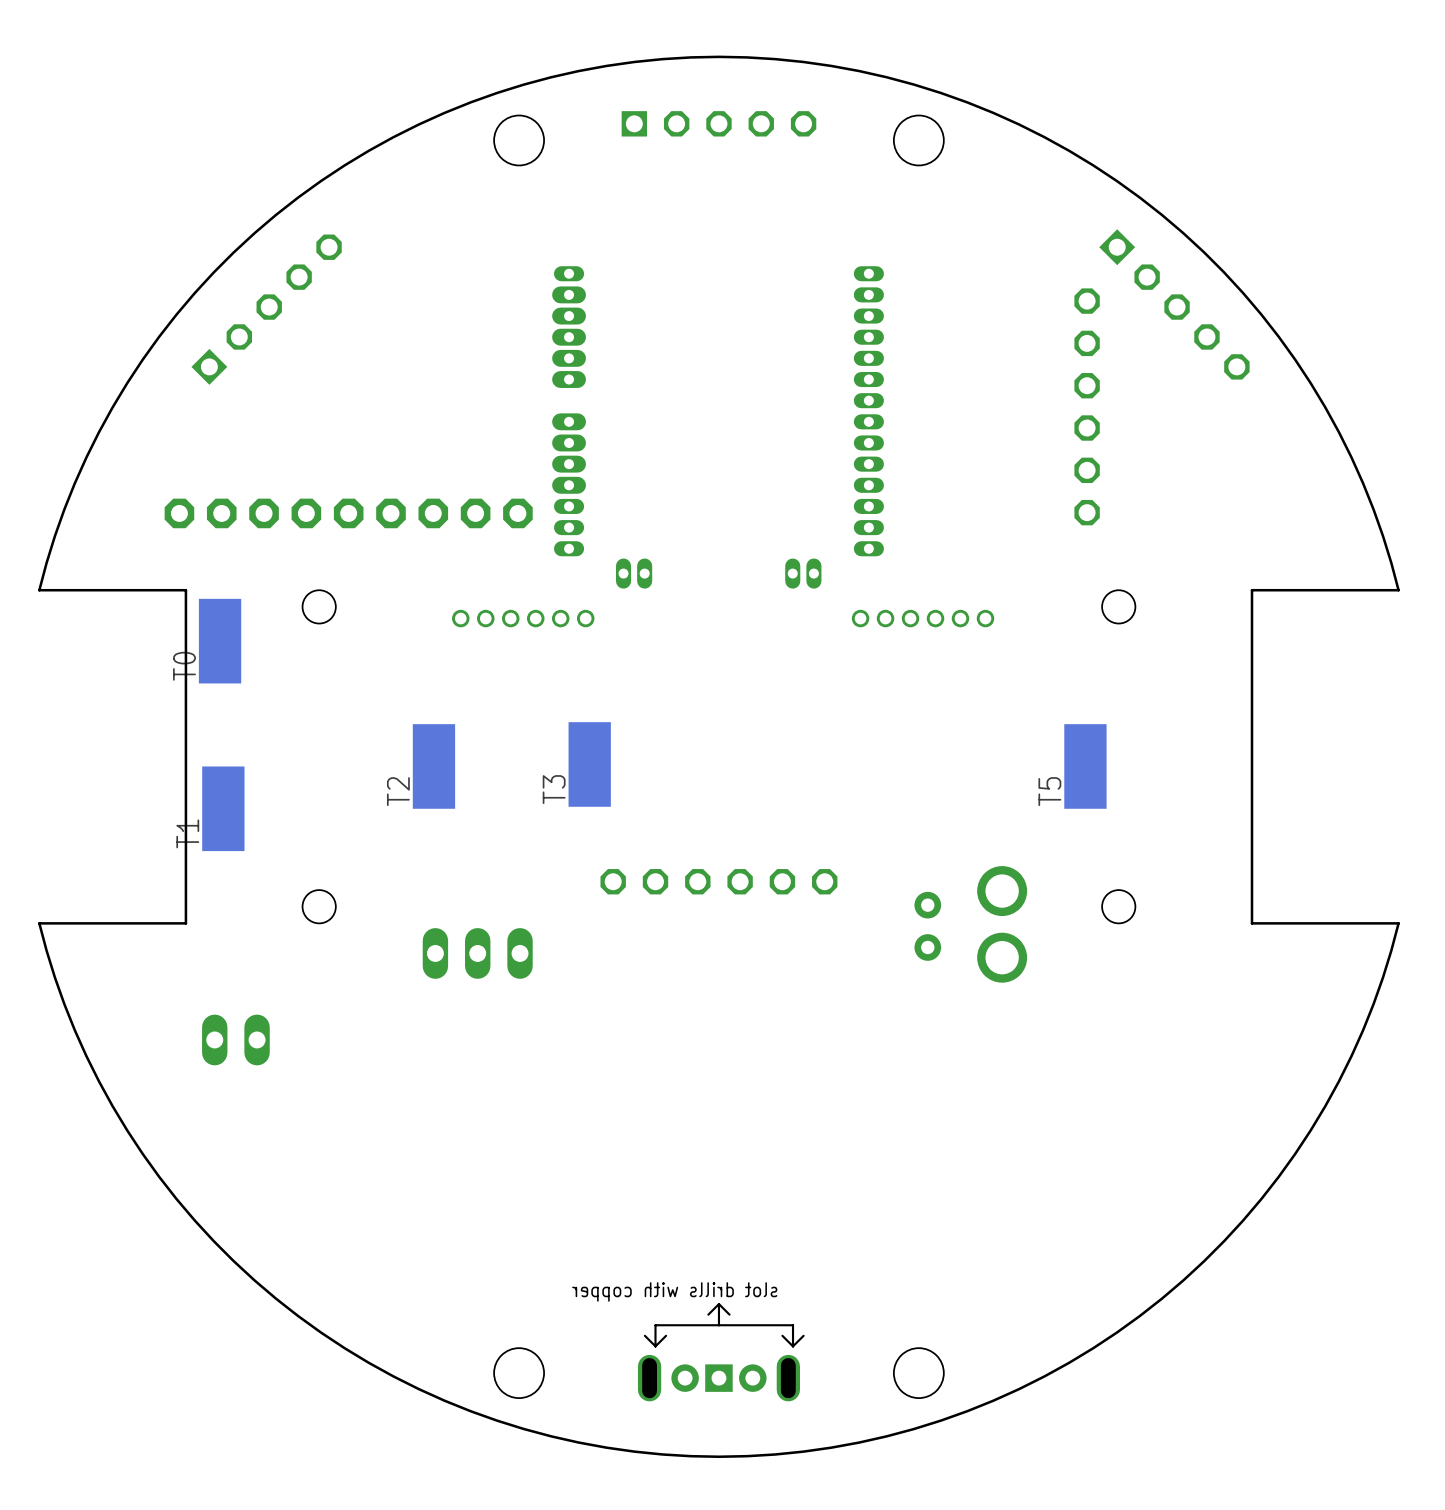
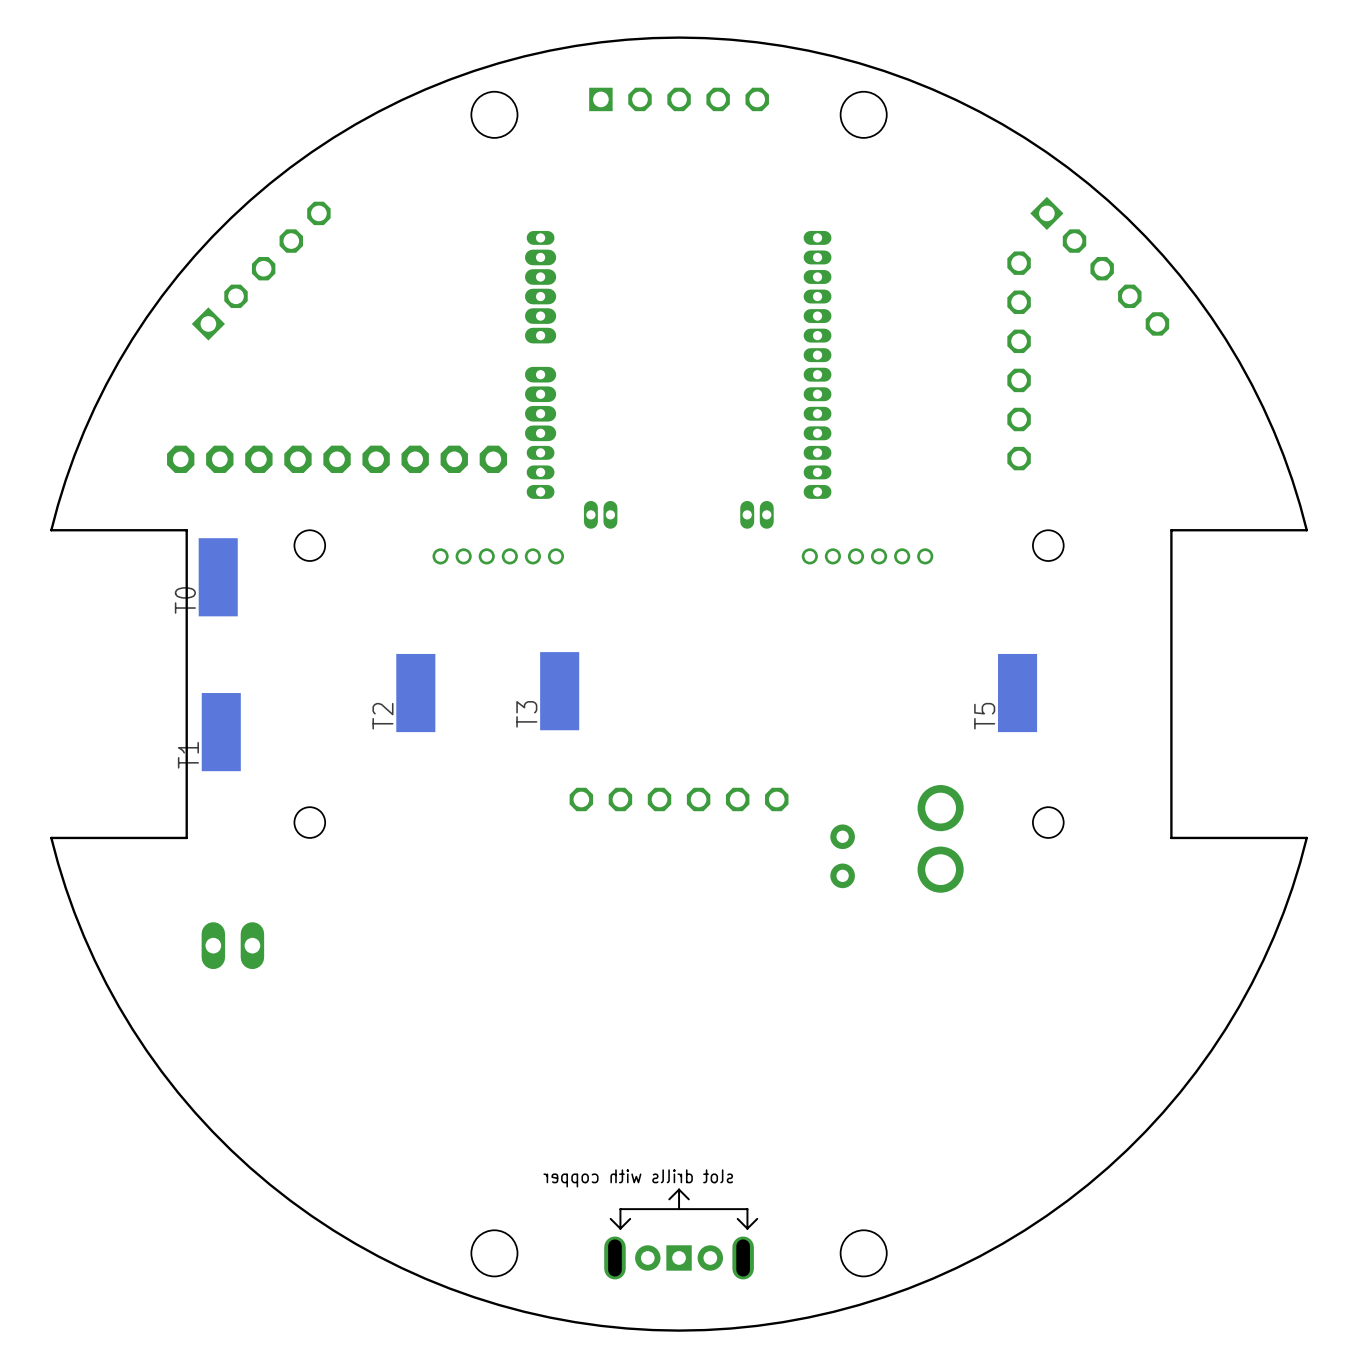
part position: (927, 926) -> (842, 856)
part: (477, 953) -> none

